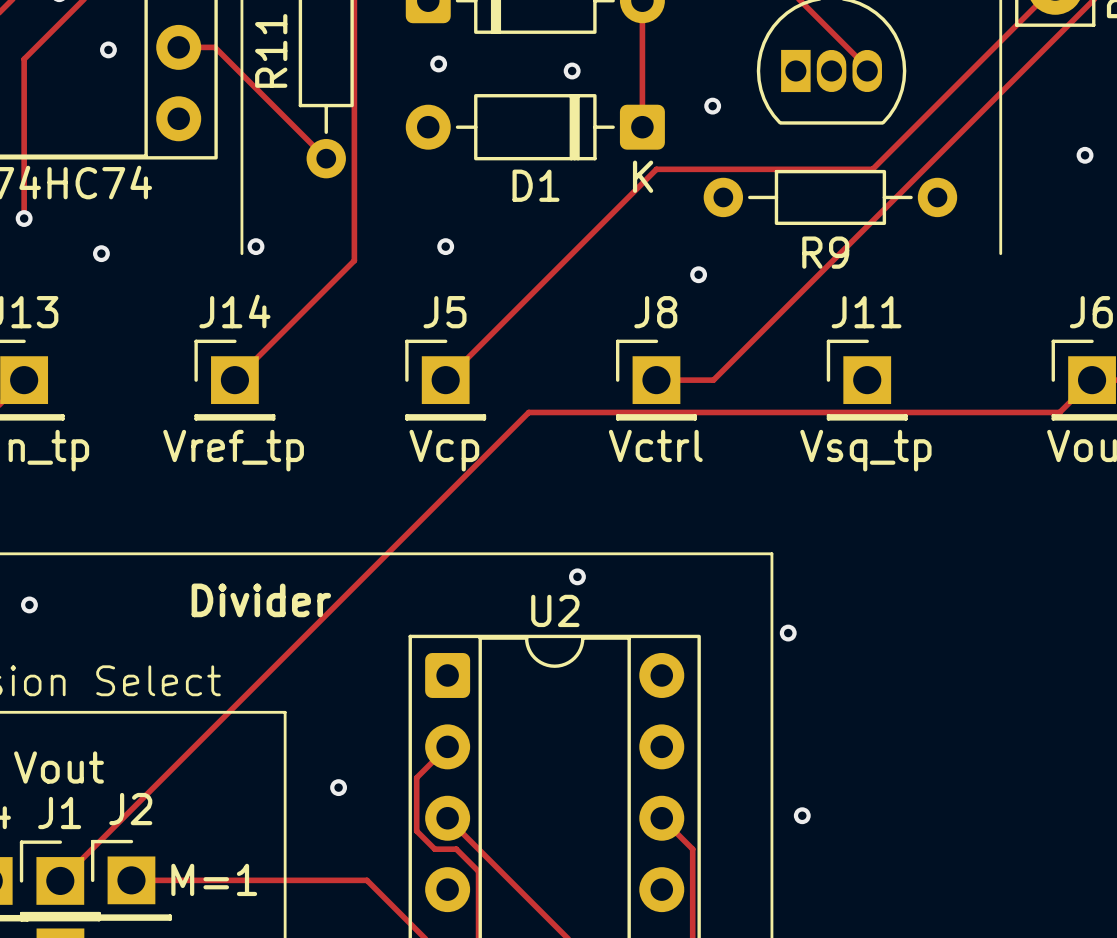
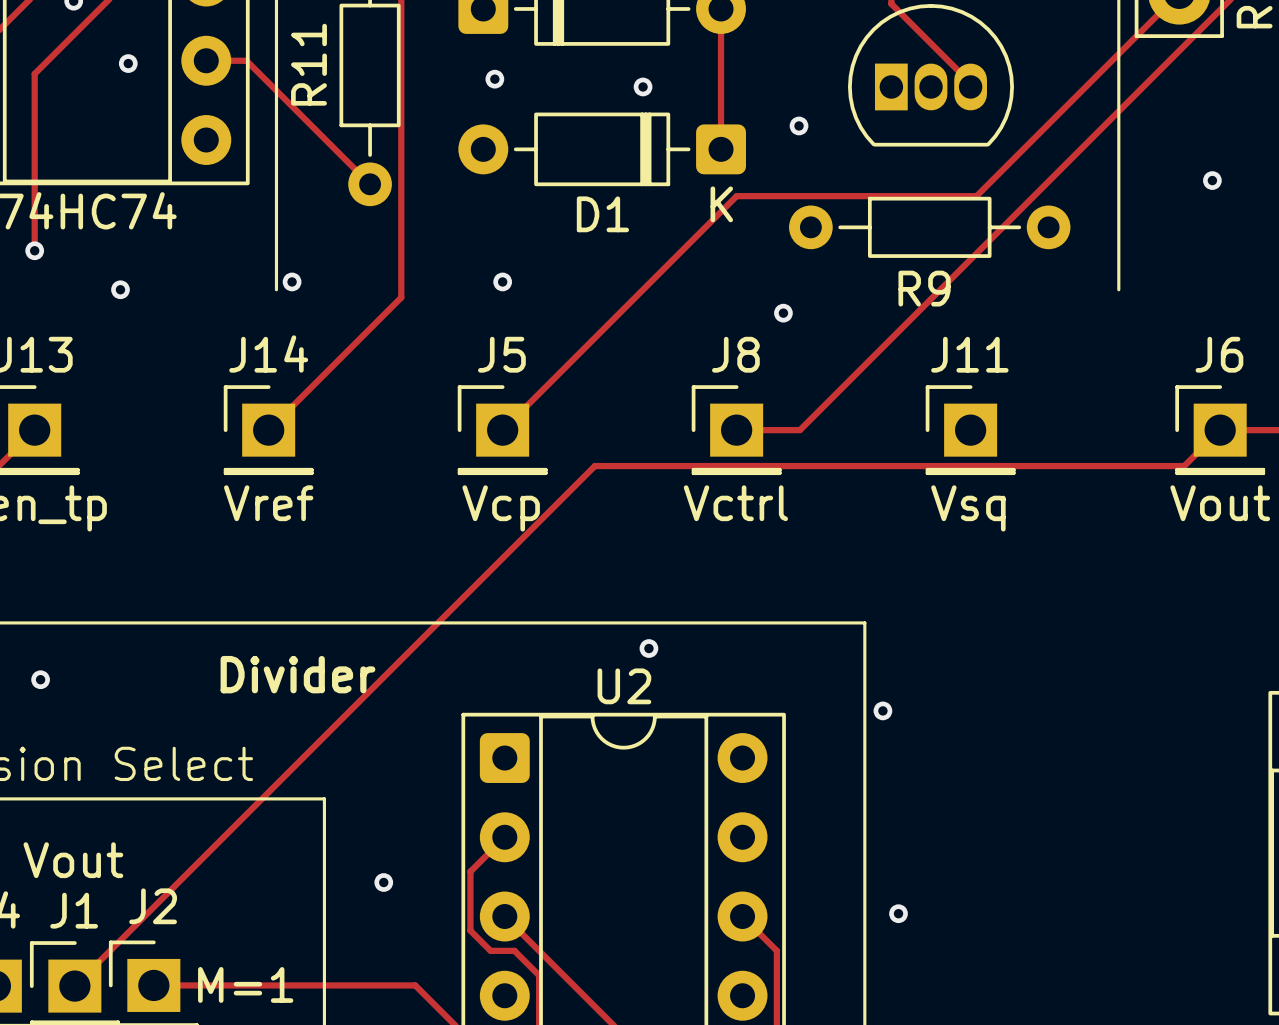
J14 value: Vref_tp (233, 450) -> Vref (268, 503)
J11 value: Vsq_tp (865, 450) -> Vsq (968, 508)

